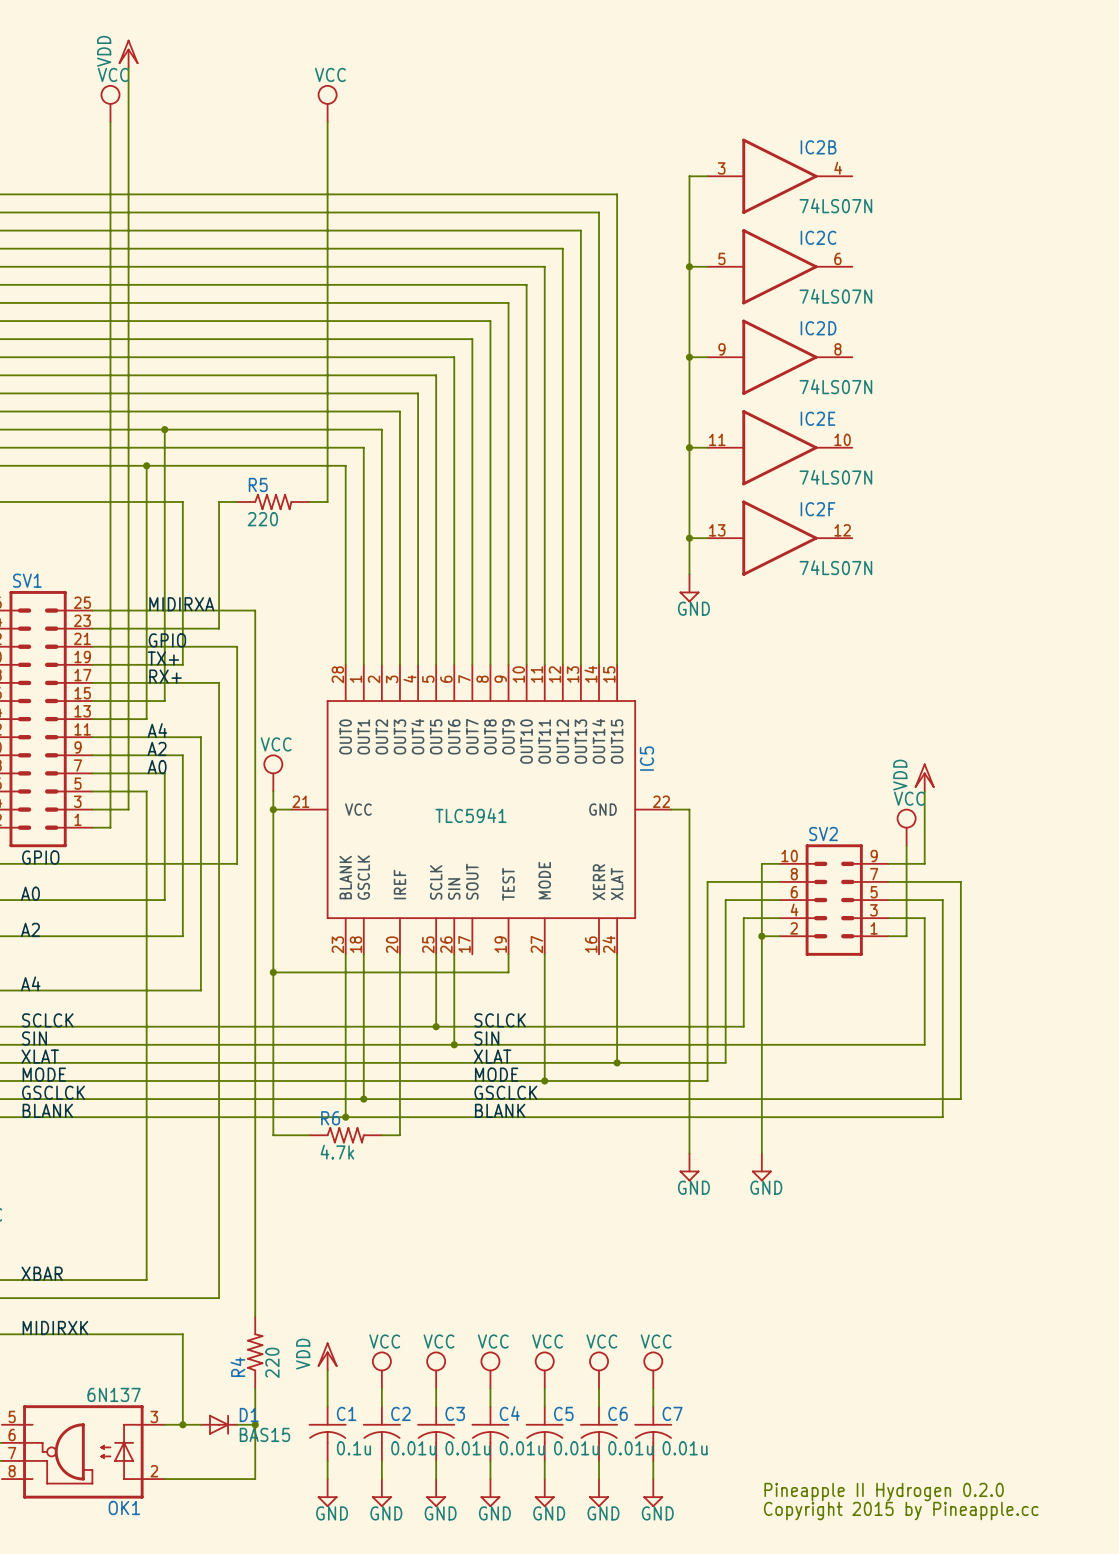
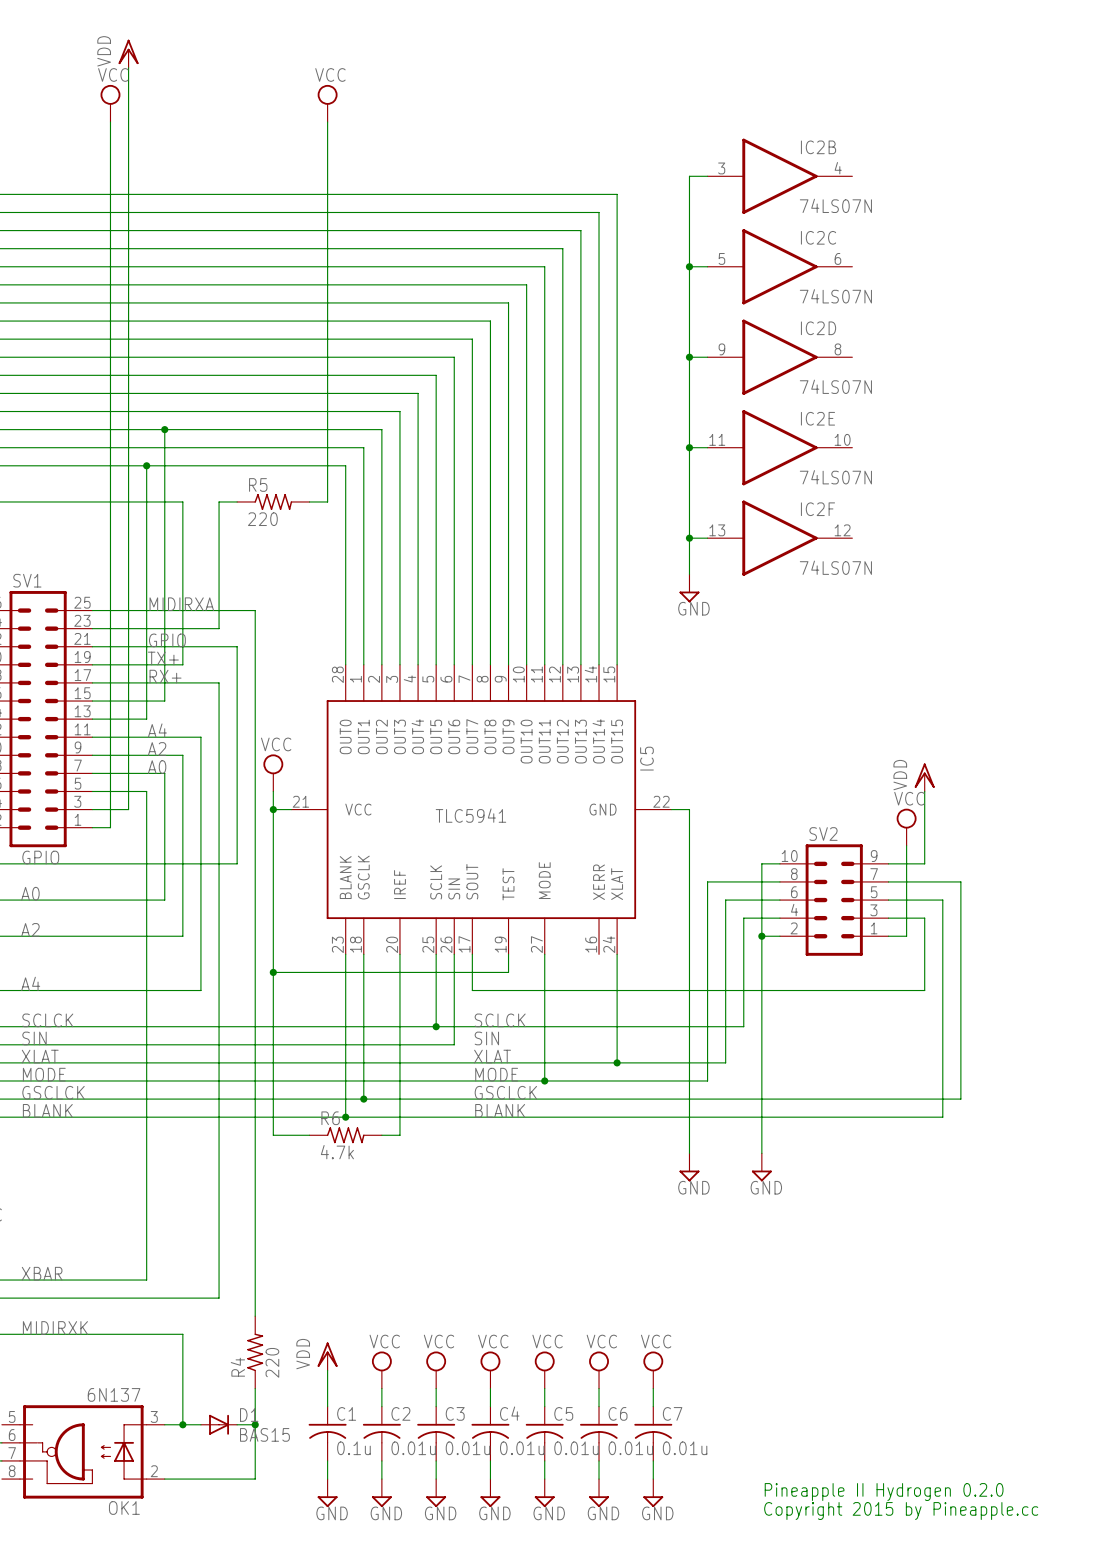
wire: (924, 990) (924, 1044) (454, 1044) -> (924, 990) (472, 990) (472, 954)
junction: (454, 1044) -> none

